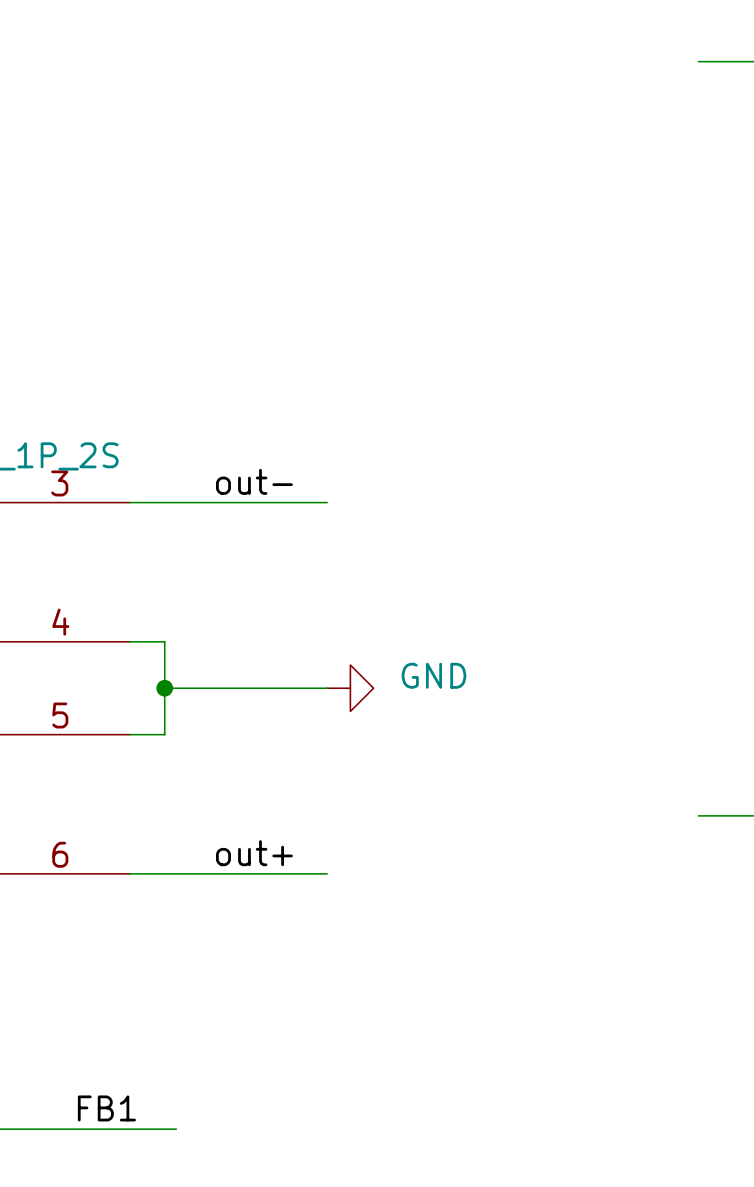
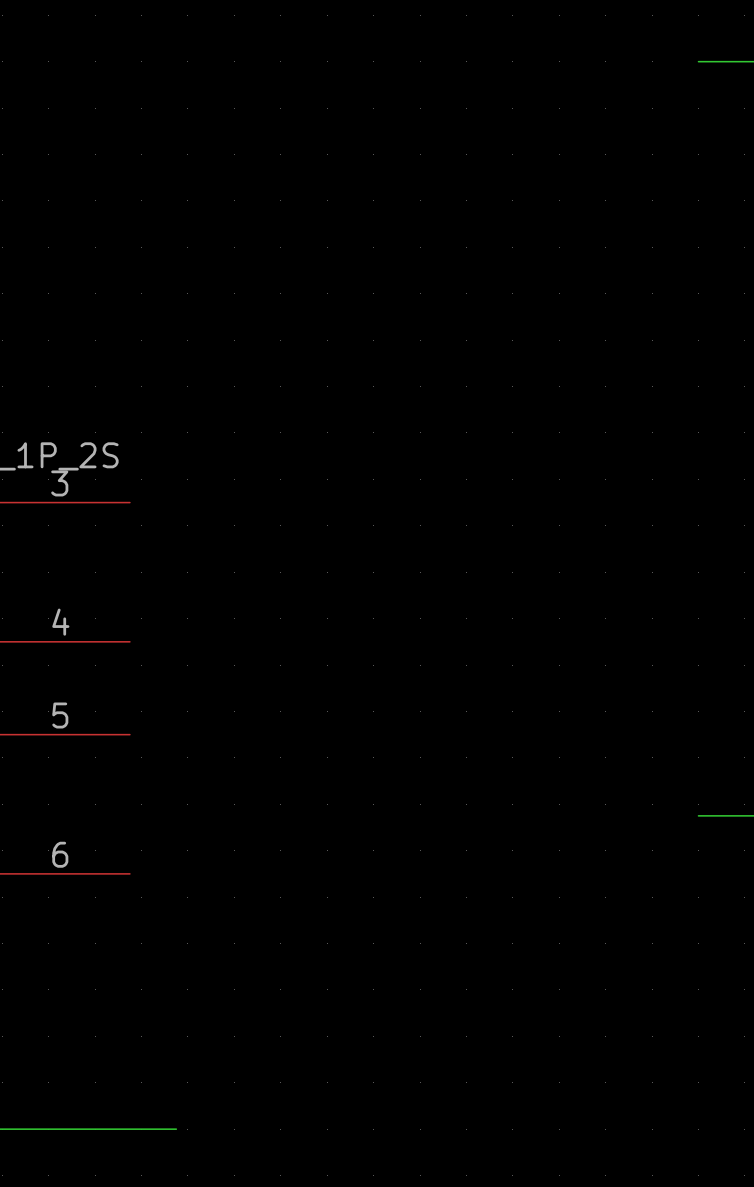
label: out- (254, 481) -> none
wire: (129, 502) (327, 502) -> none
wire: (129, 641) (164, 641) (164, 734) (129, 734) -> none
wire: (164, 688) (327, 688) -> none
junction: (164, 688) -> none
power symbol: GND (350, 688) -> none
label: out+ (254, 853) -> none
wire: (129, 873) (327, 873) -> none
label: FB1 (106, 1108) -> none

